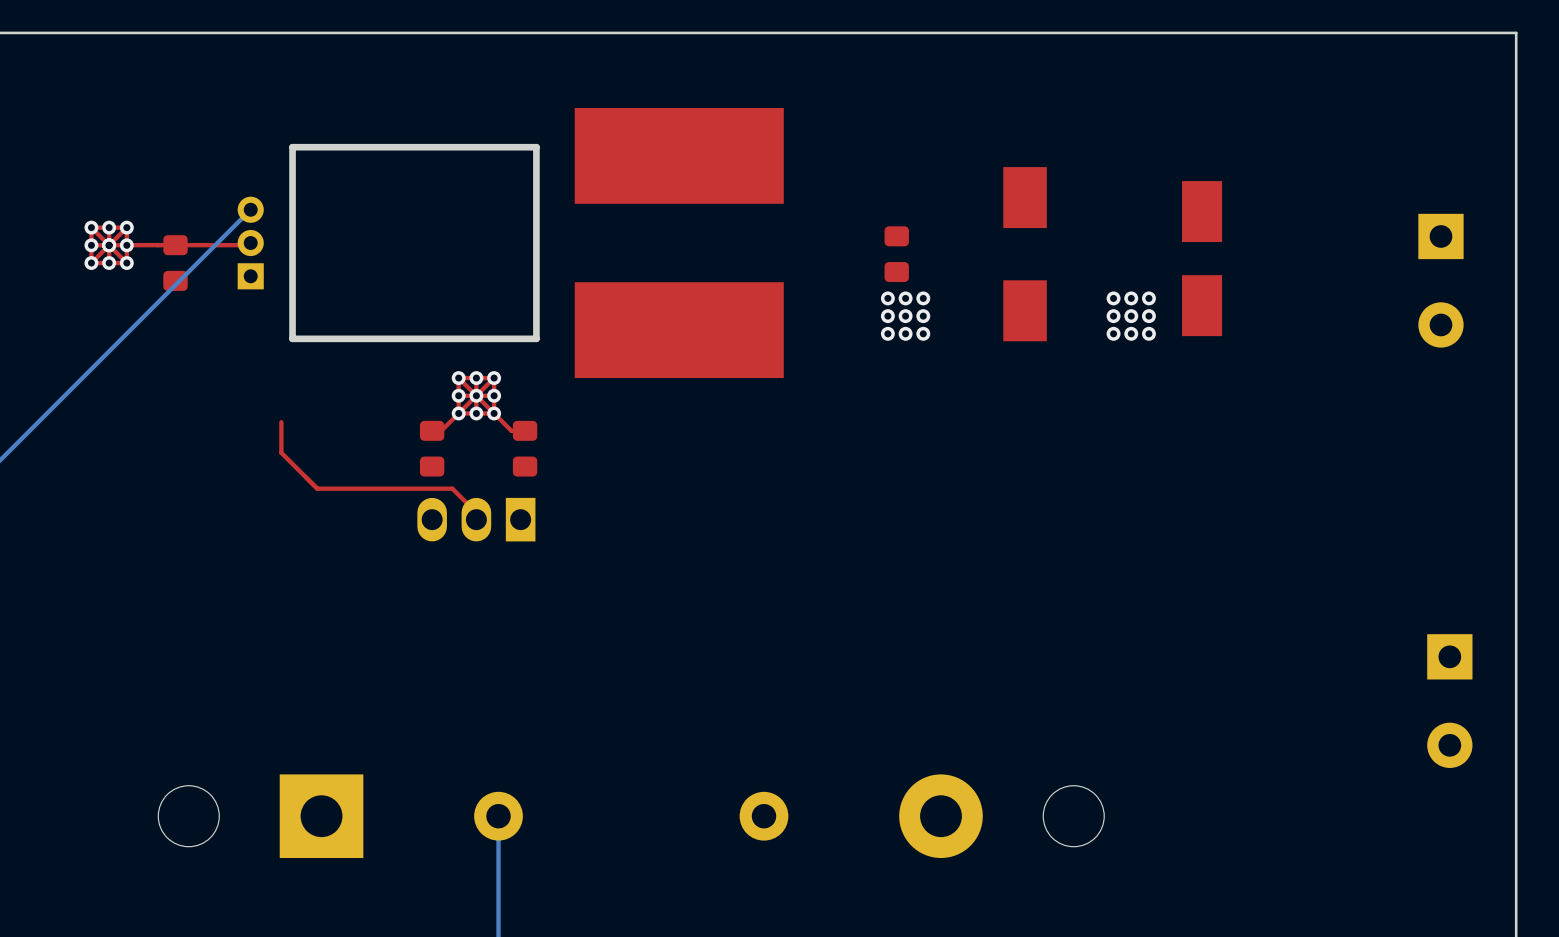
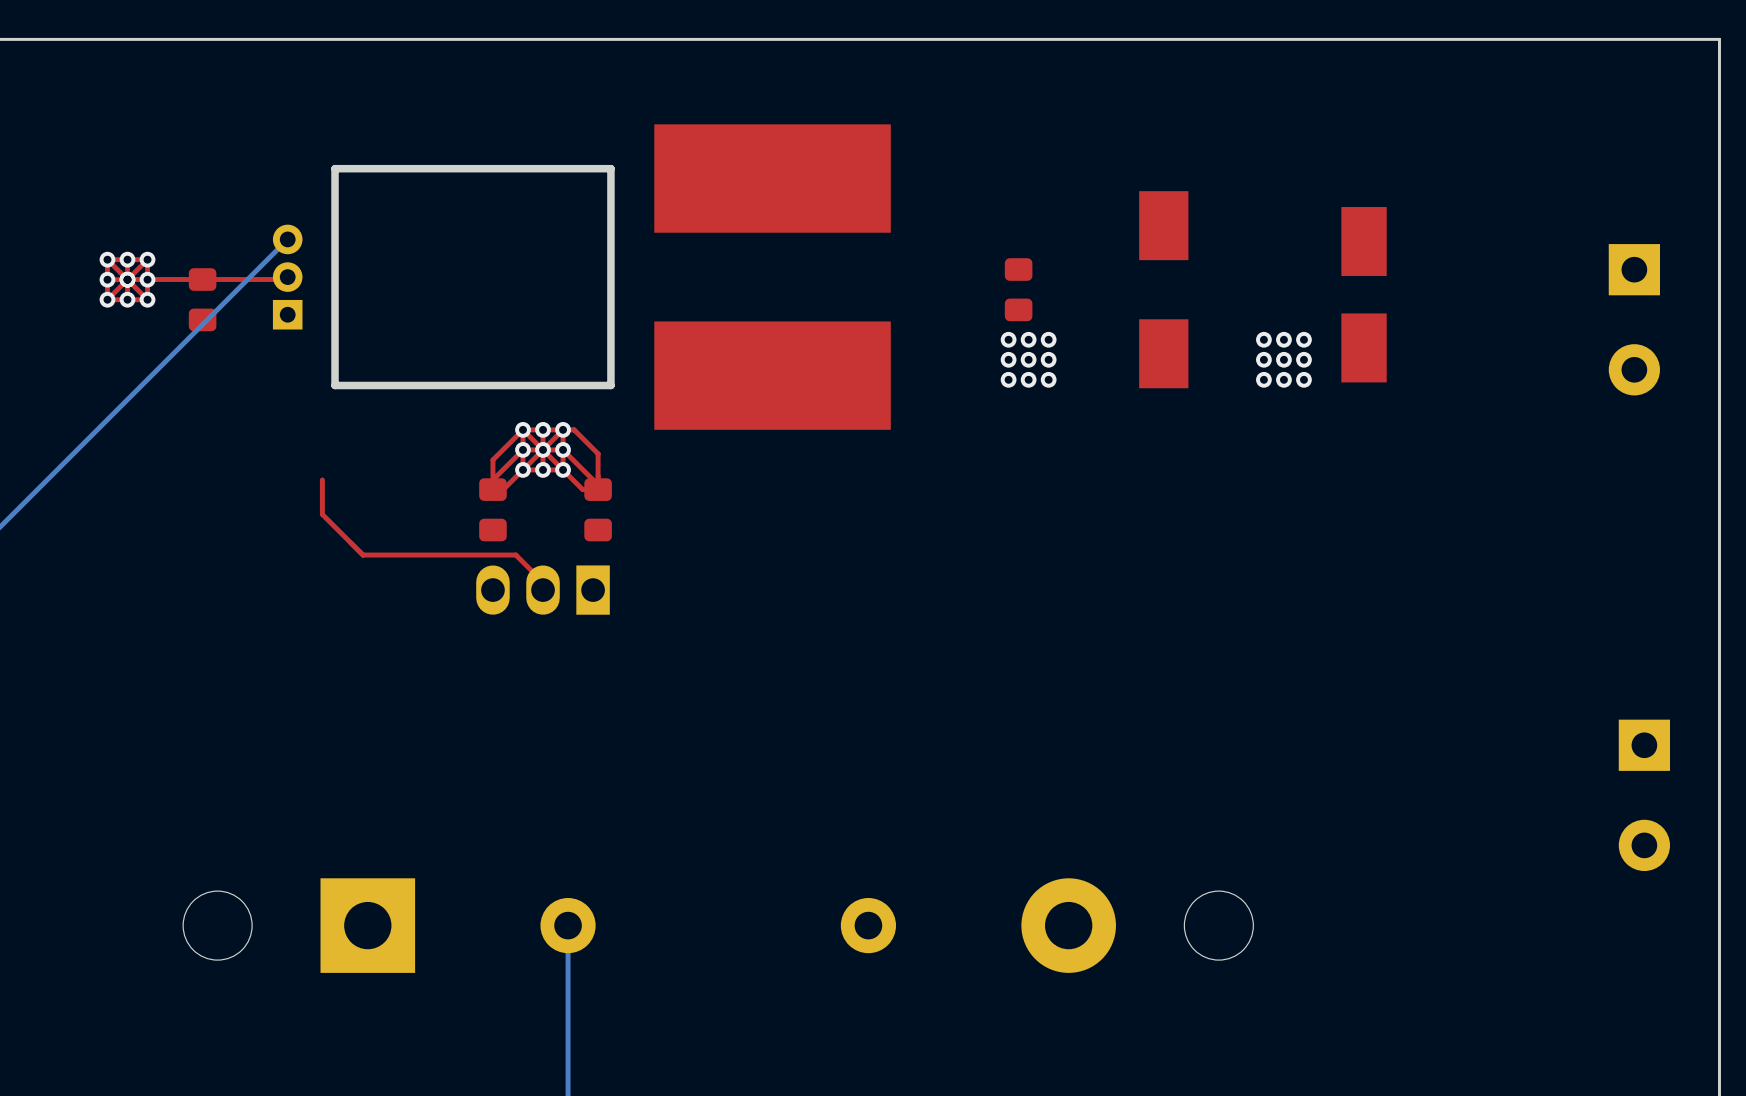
top track: none -> (523, 429) (492, 459) (492, 489)
top track: none -> (563, 429) (574, 429) (598, 453) (598, 489)
top track: none -> (523, 449) (492, 479)
top track: none -> (563, 449) (598, 484)

